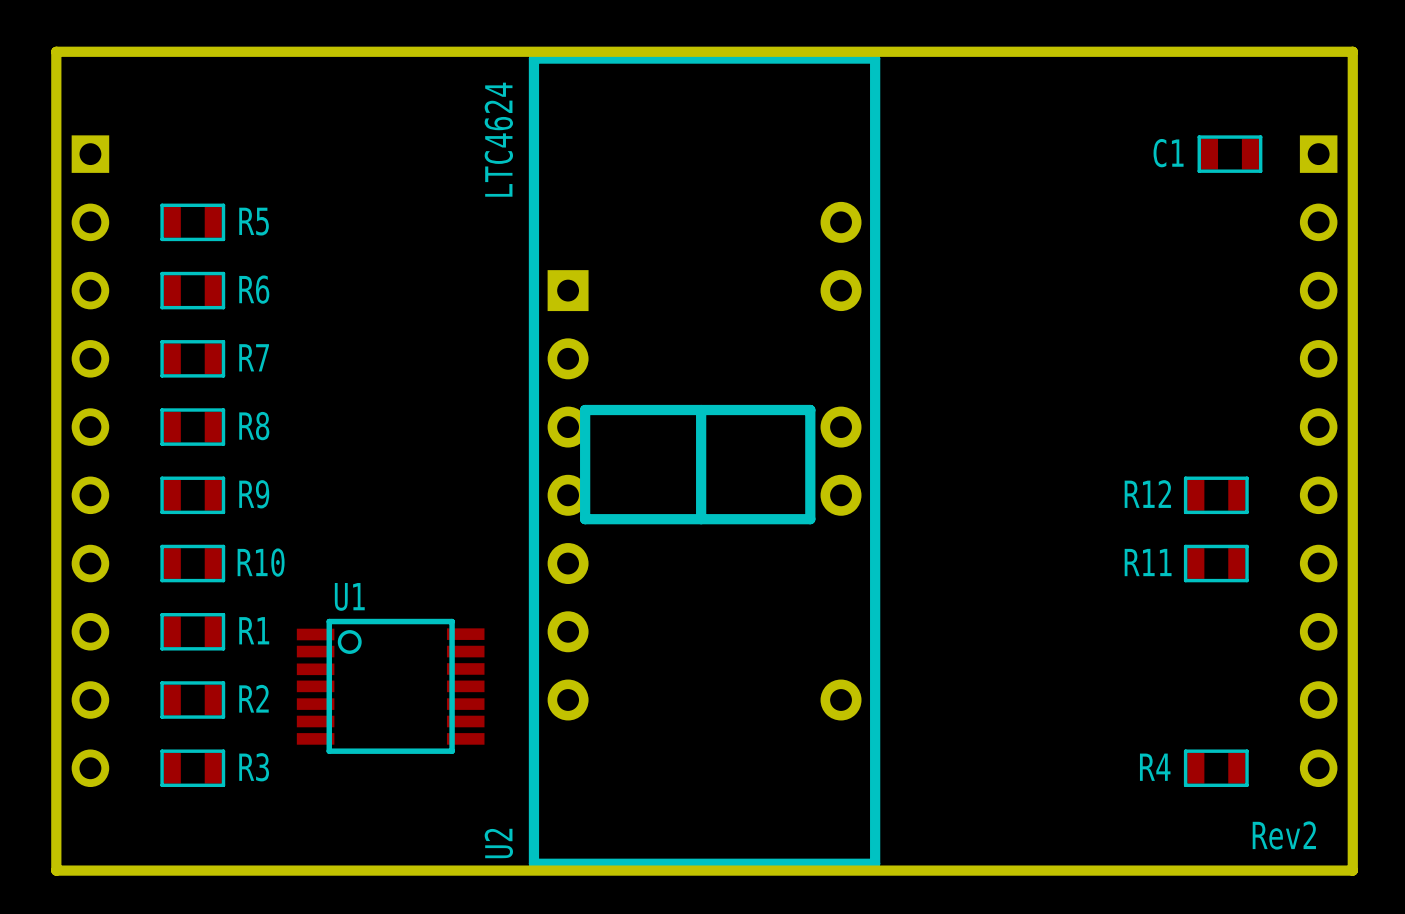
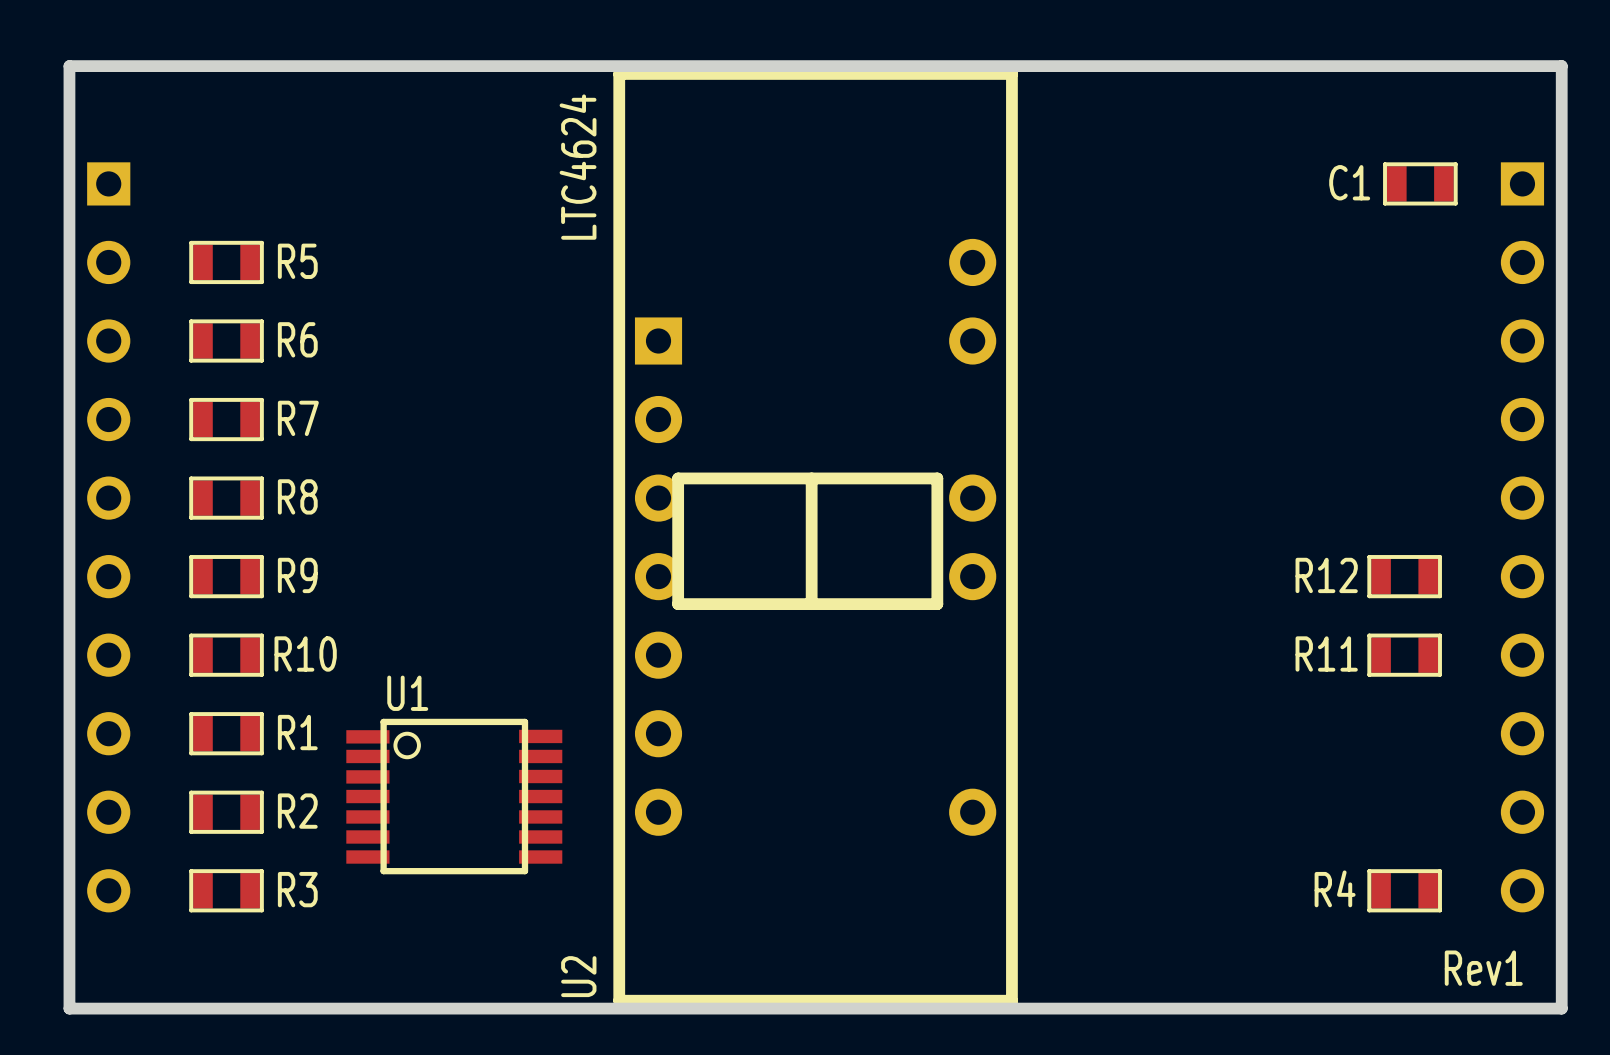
text: Rev2 (1284, 835) -> Rev1 (1483, 968)

